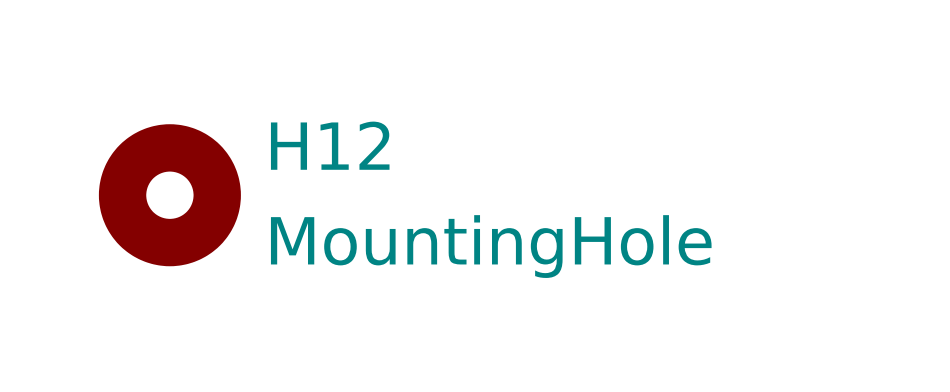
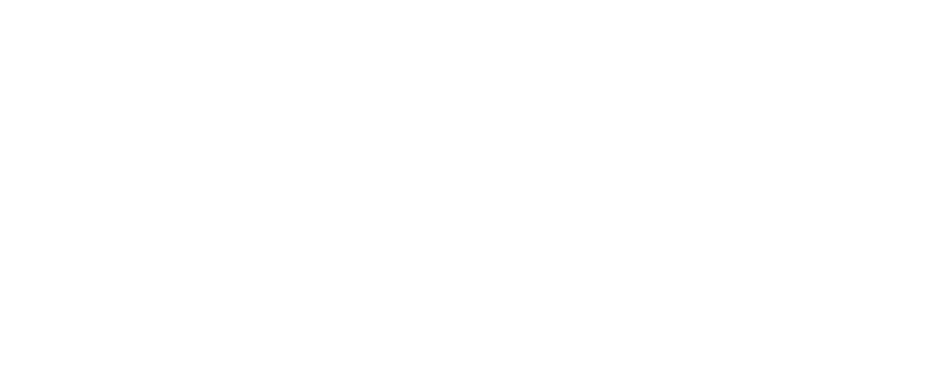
H12: MountingHole (169, 195) -> none

